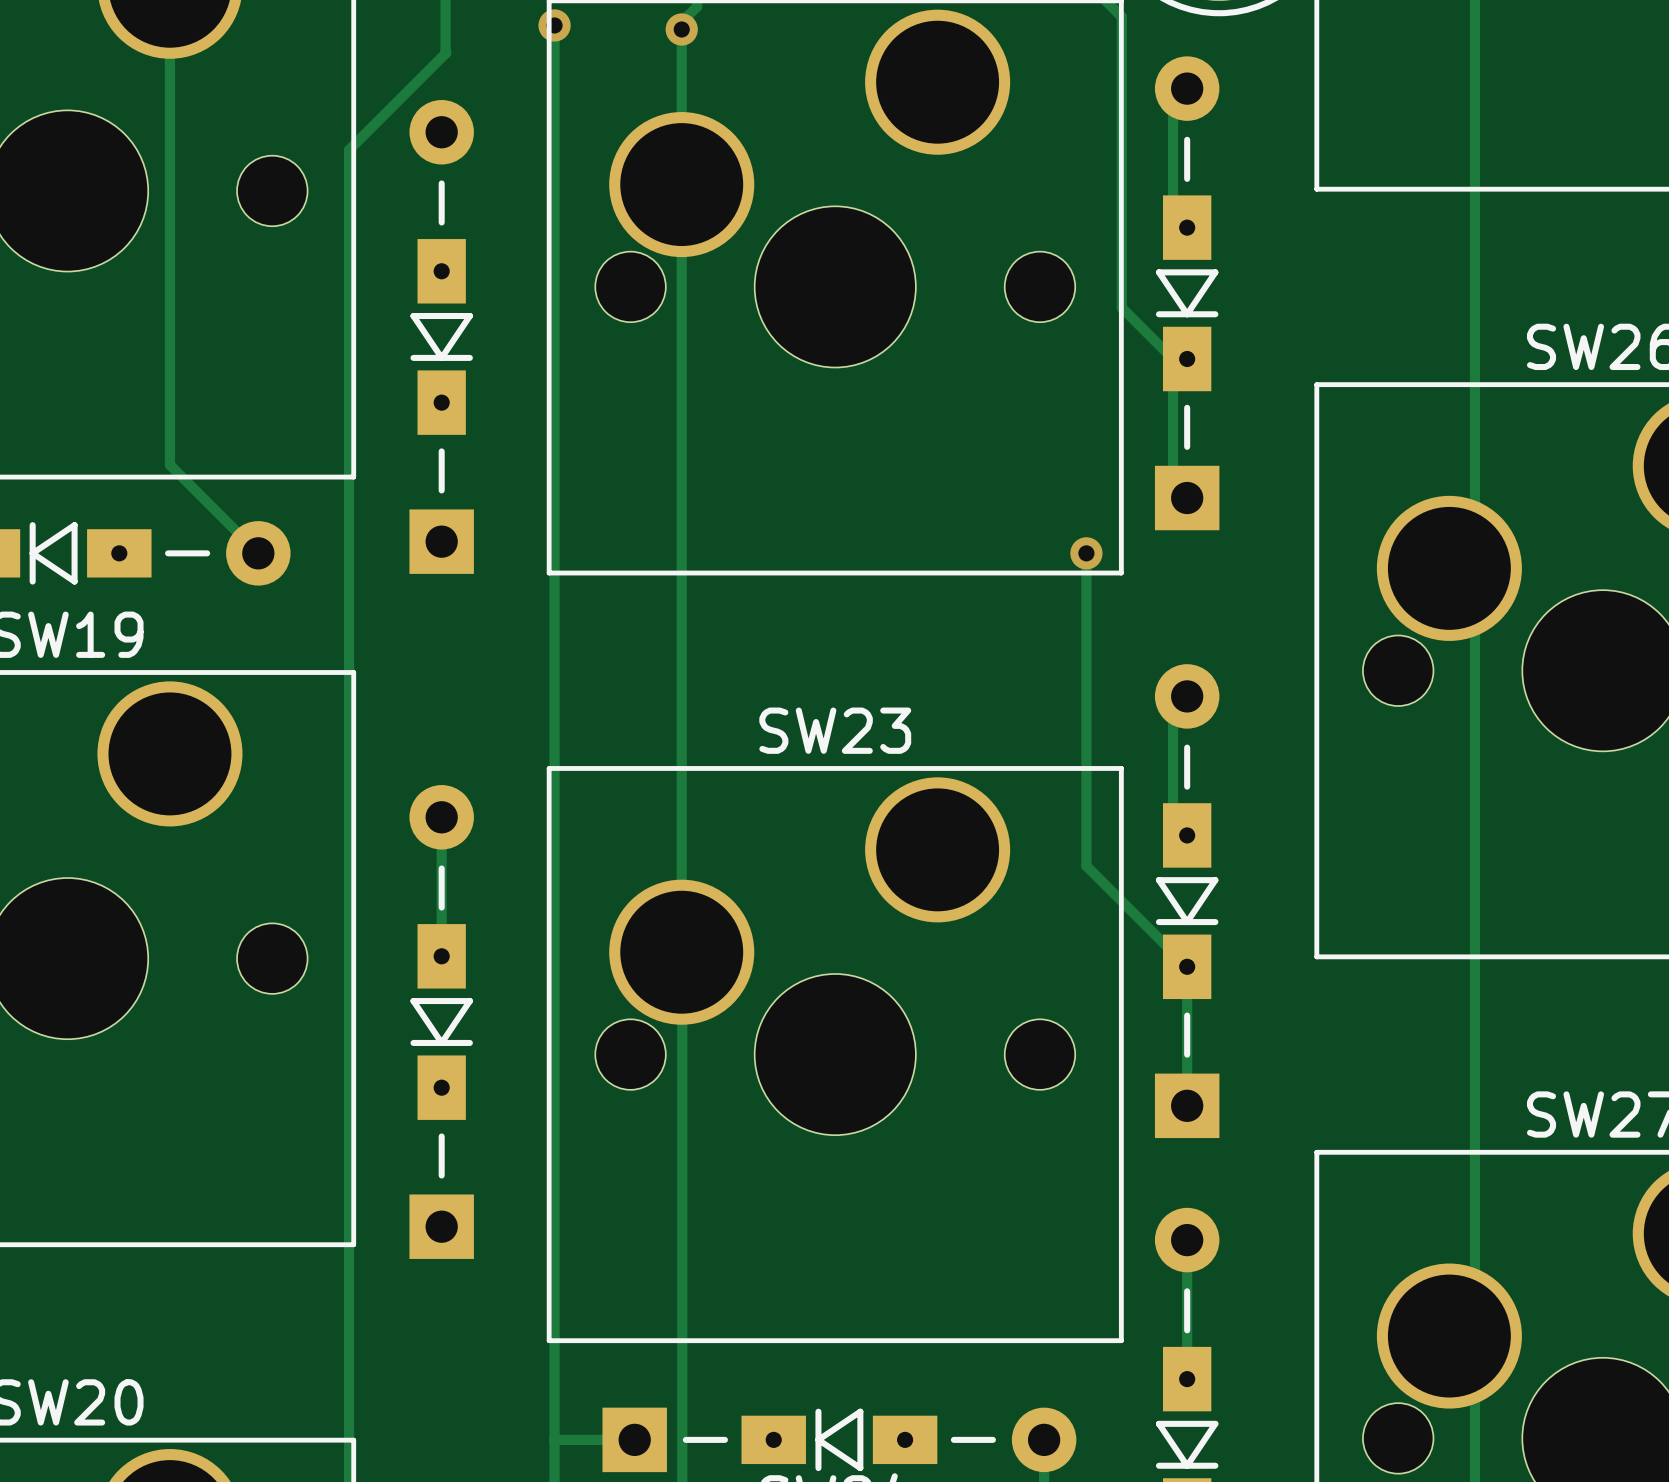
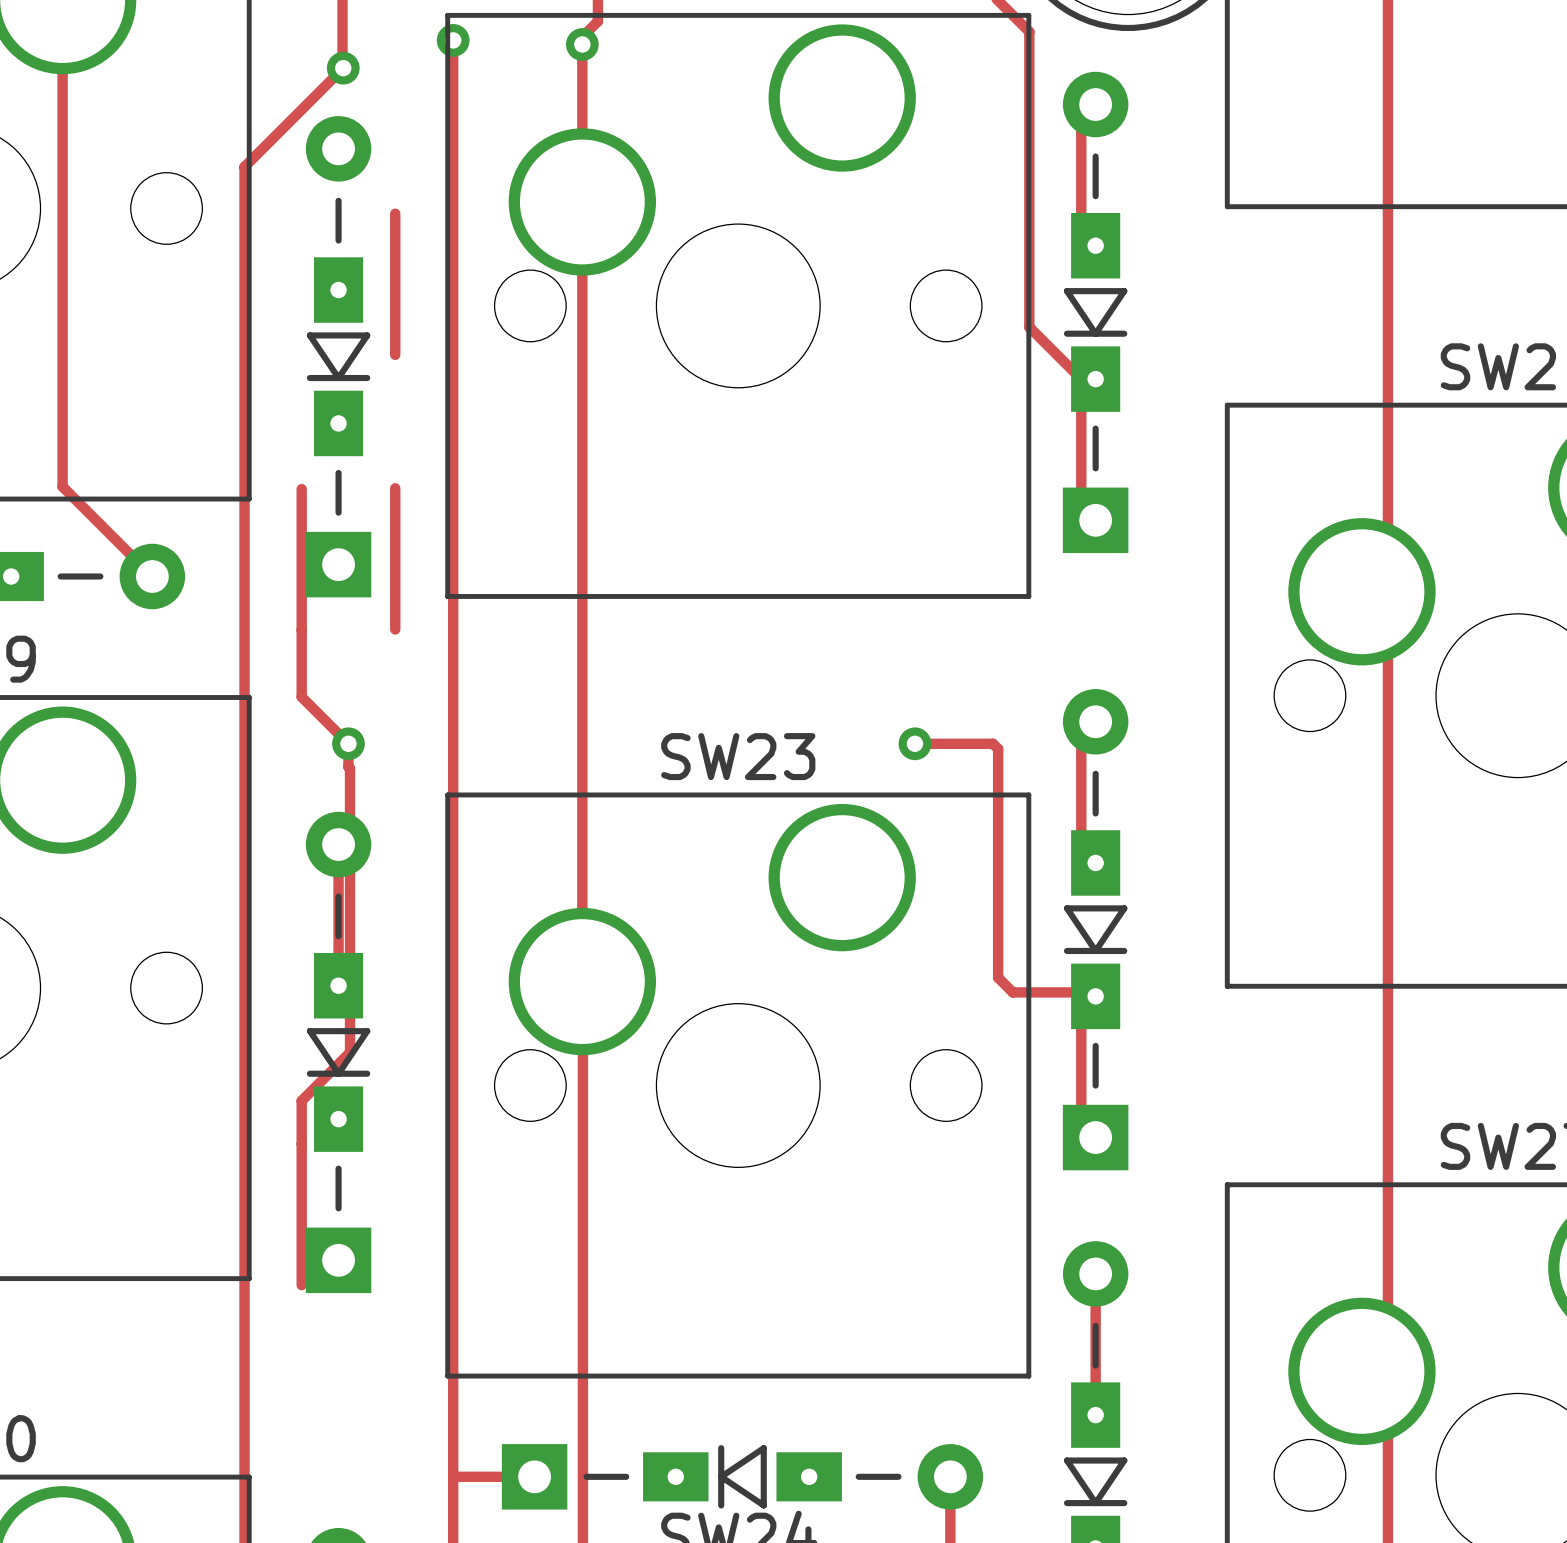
via: none -> (343, 68)
track: none -> (395, 213) (395, 354)
track: none -> (395, 488) (395, 629)
track: none -> (301, 489) (301, 697) (348, 743) (350, 768) (350, 1052) (301, 1100) (301, 1285)
track: (1086, 553) (1086, 866) (1187, 966) (1187, 1105) -> none
via position: (1086, 553) -> (914, 743)
via: none -> (348, 743)
track: none -> (914, 743) (992, 743) (998, 748) (998, 977) (1012, 992) (1081, 992) (1081, 1133)

